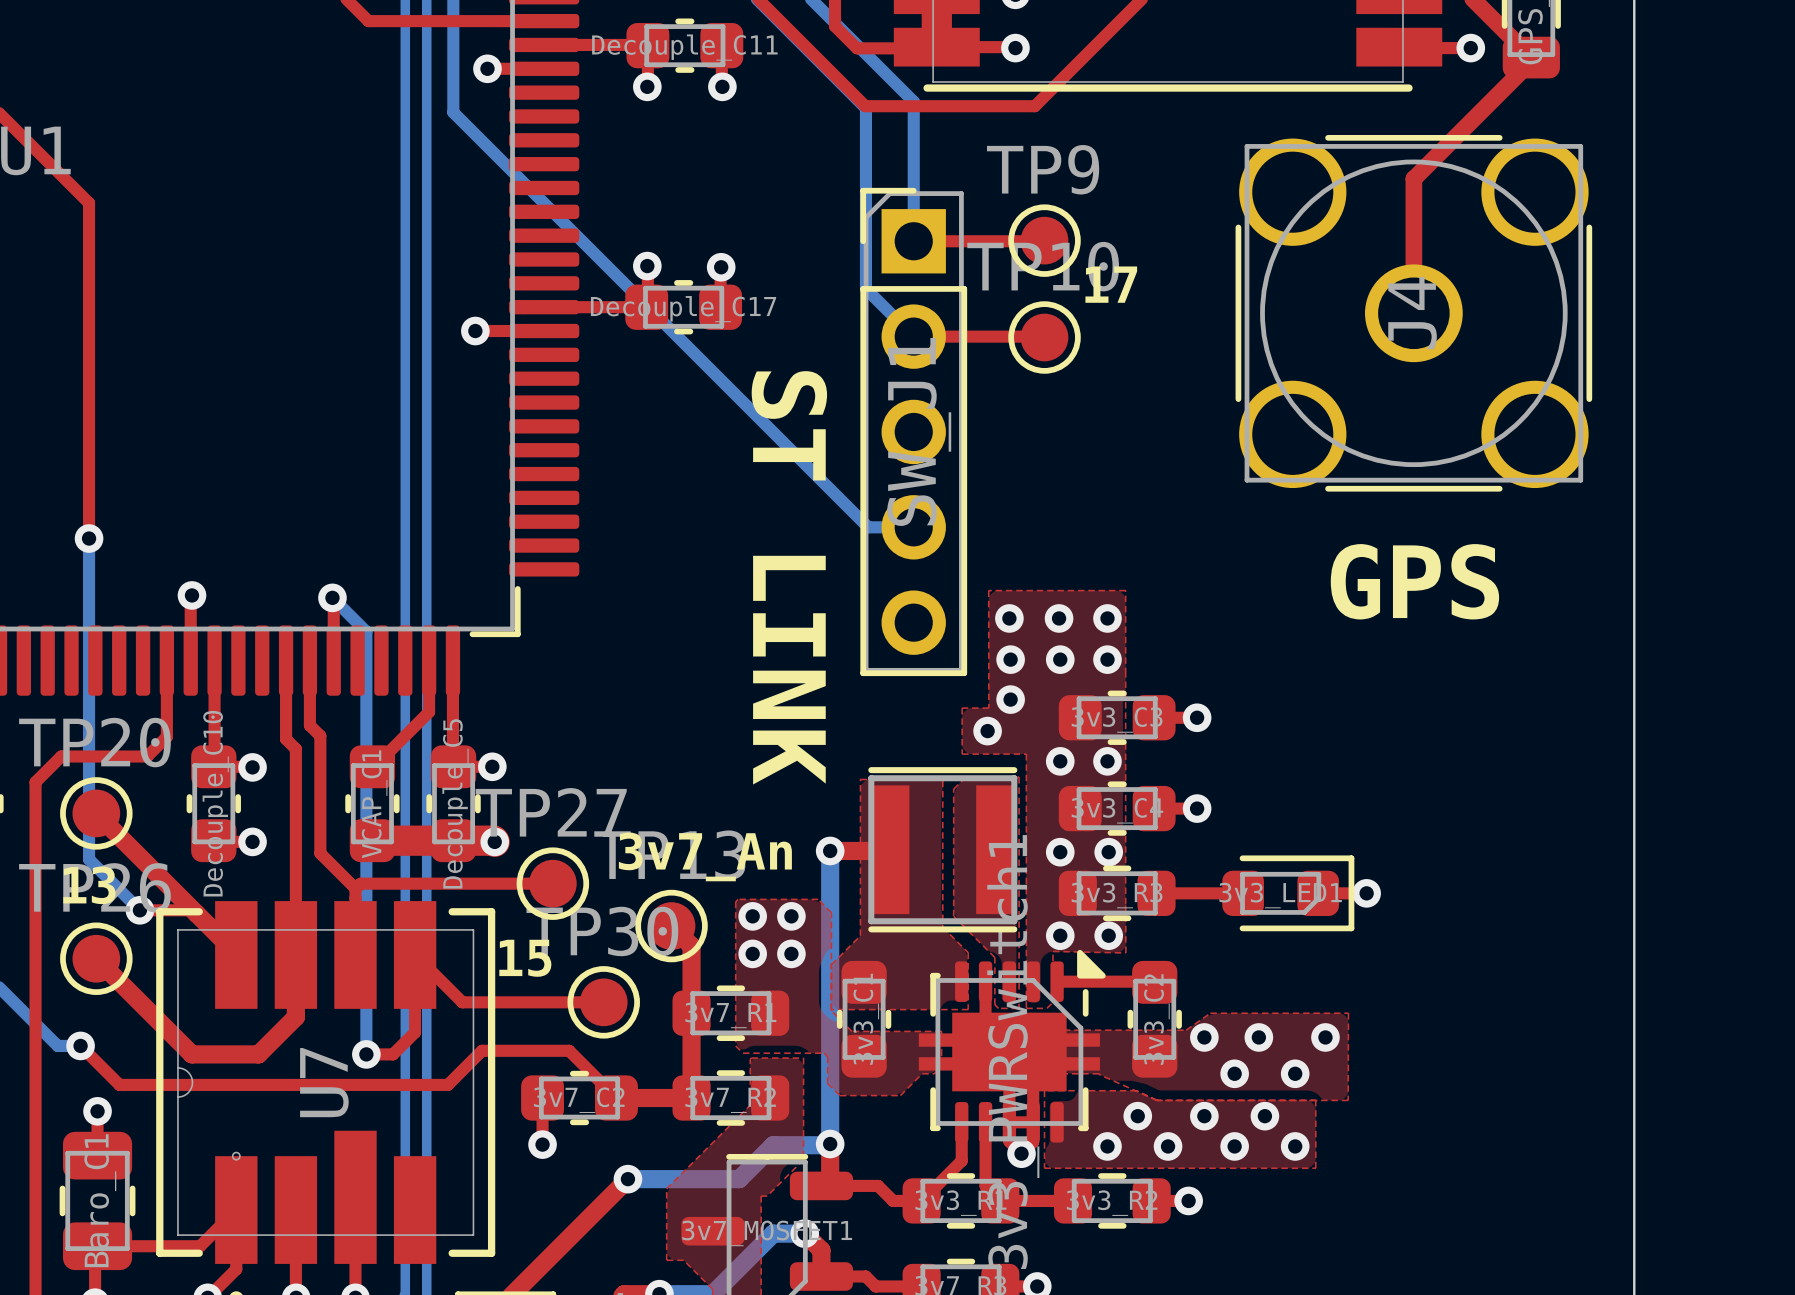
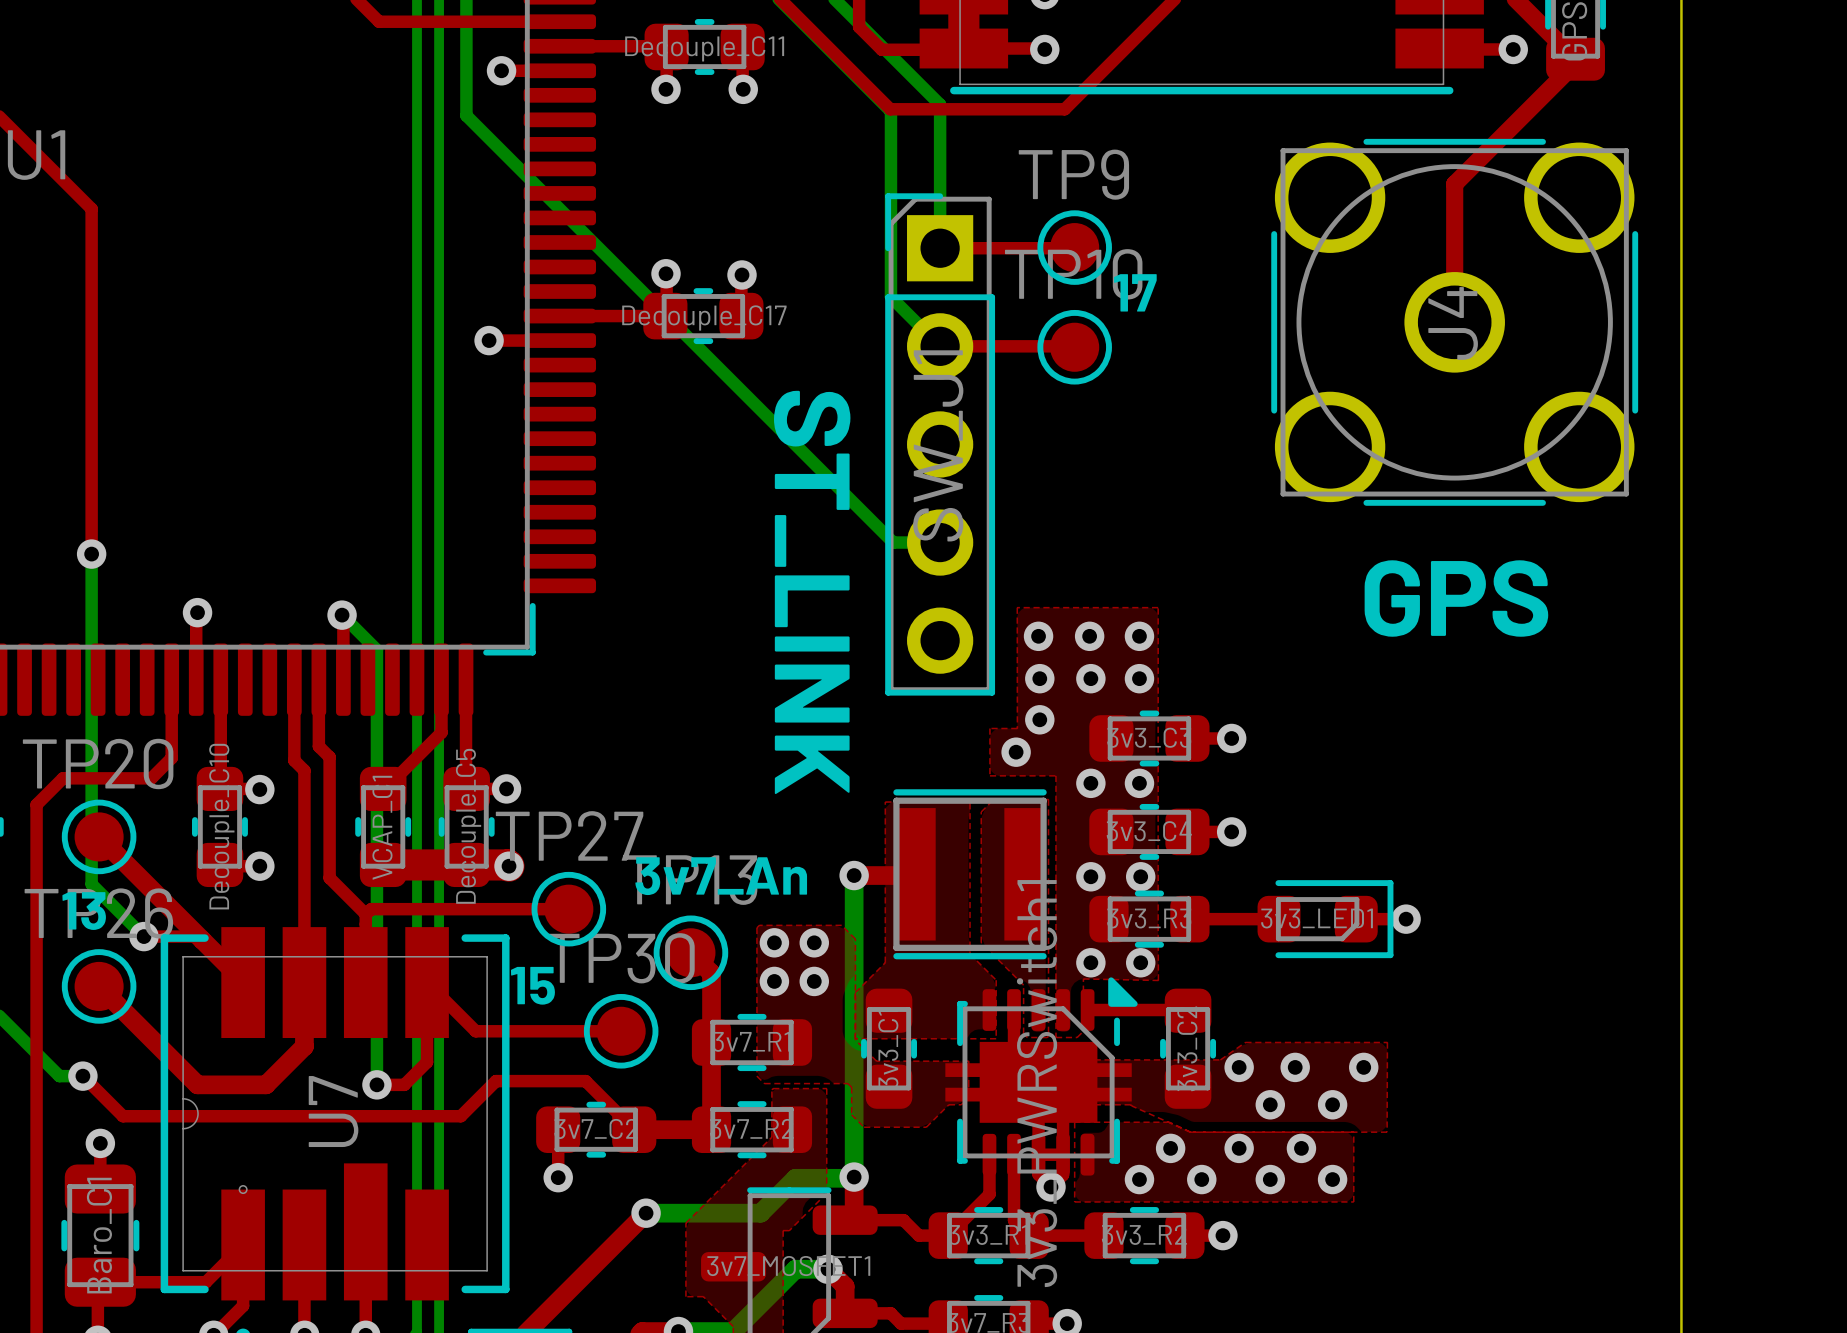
text: ST LINK (789, 577) -> ST_LINK (812, 592)

